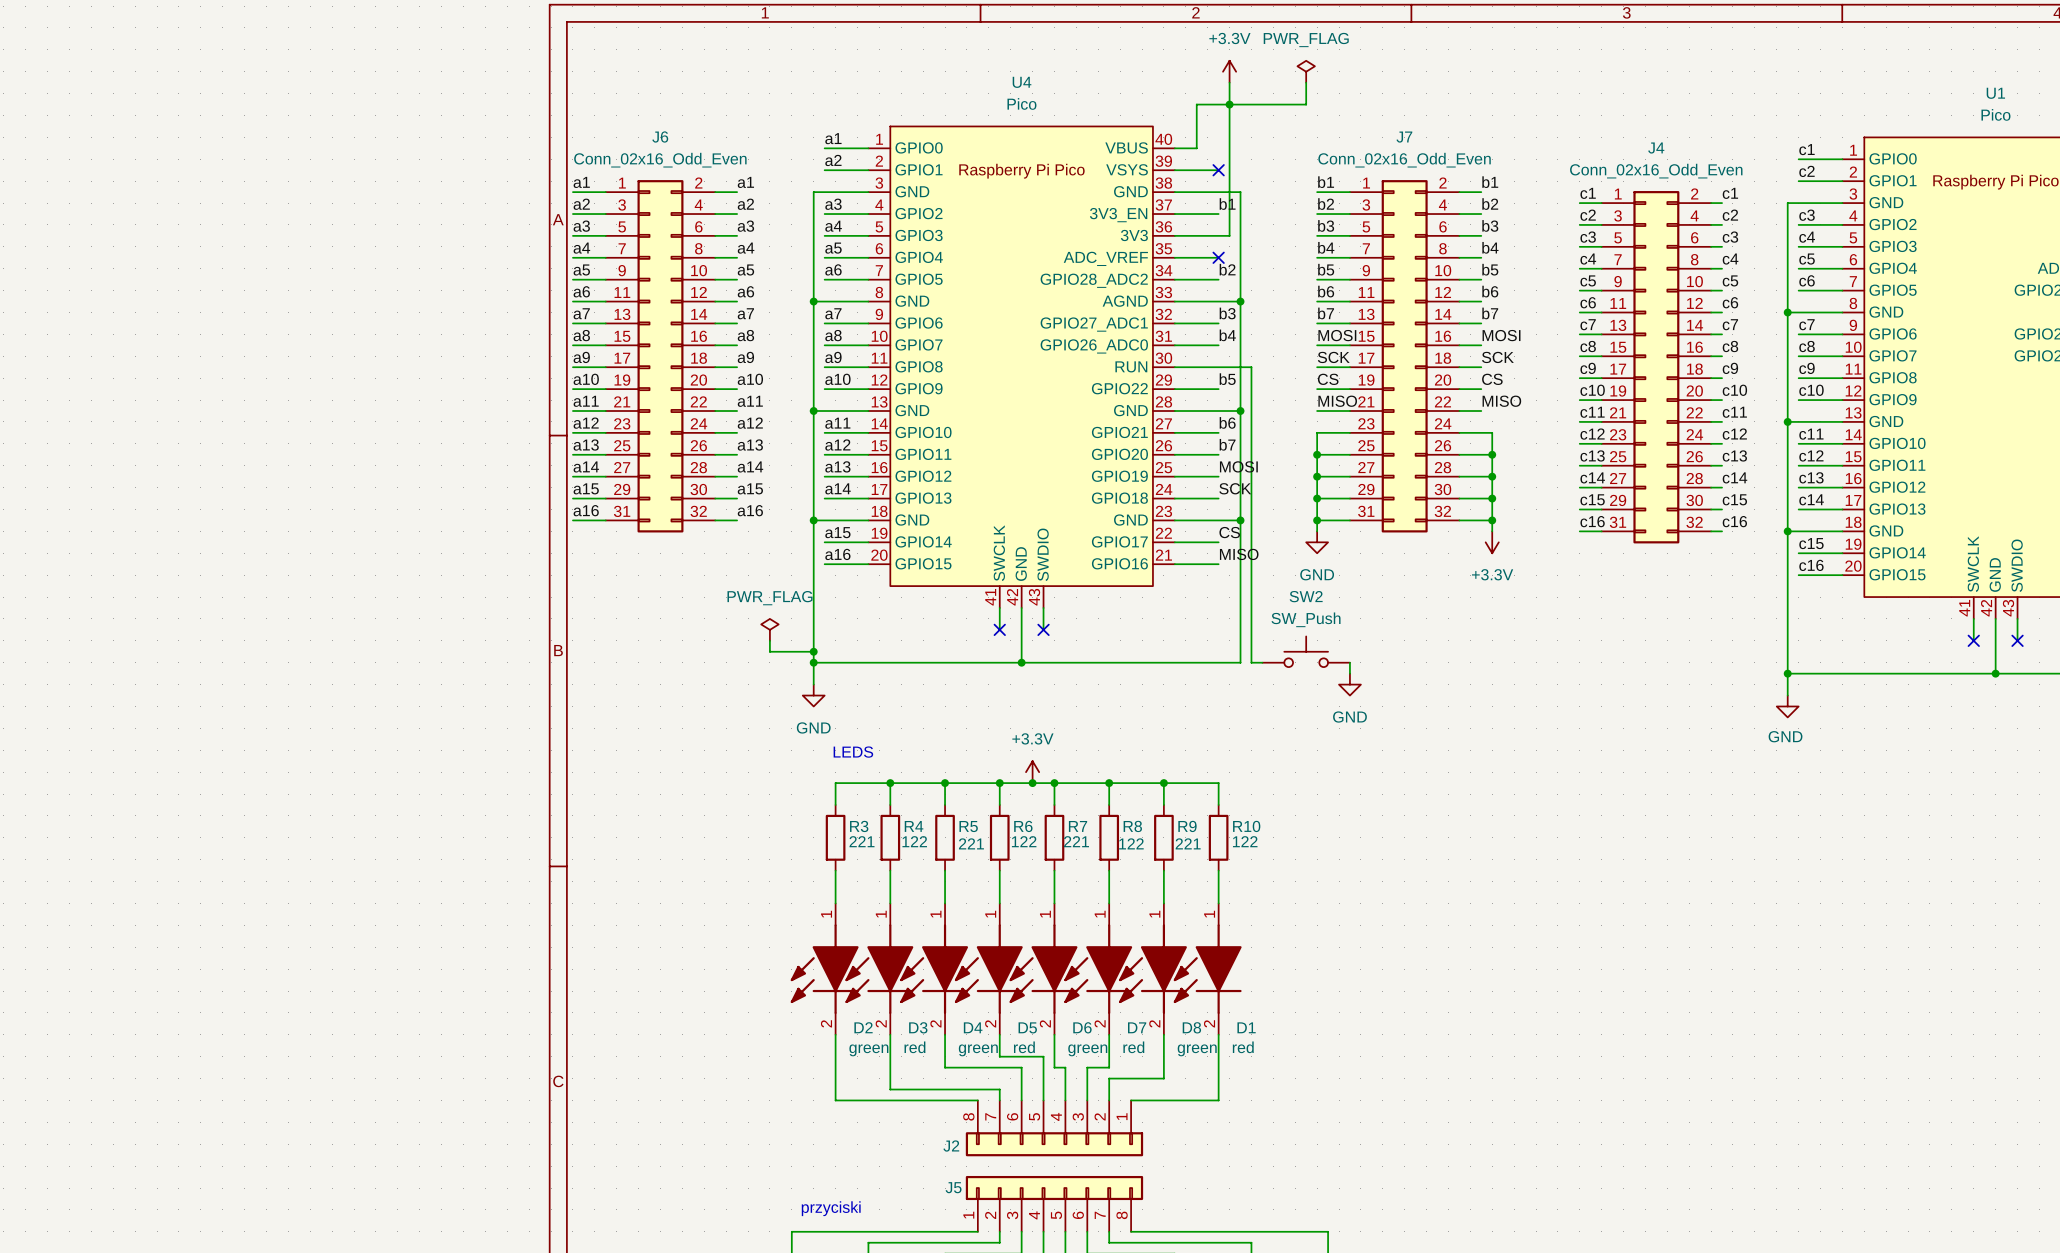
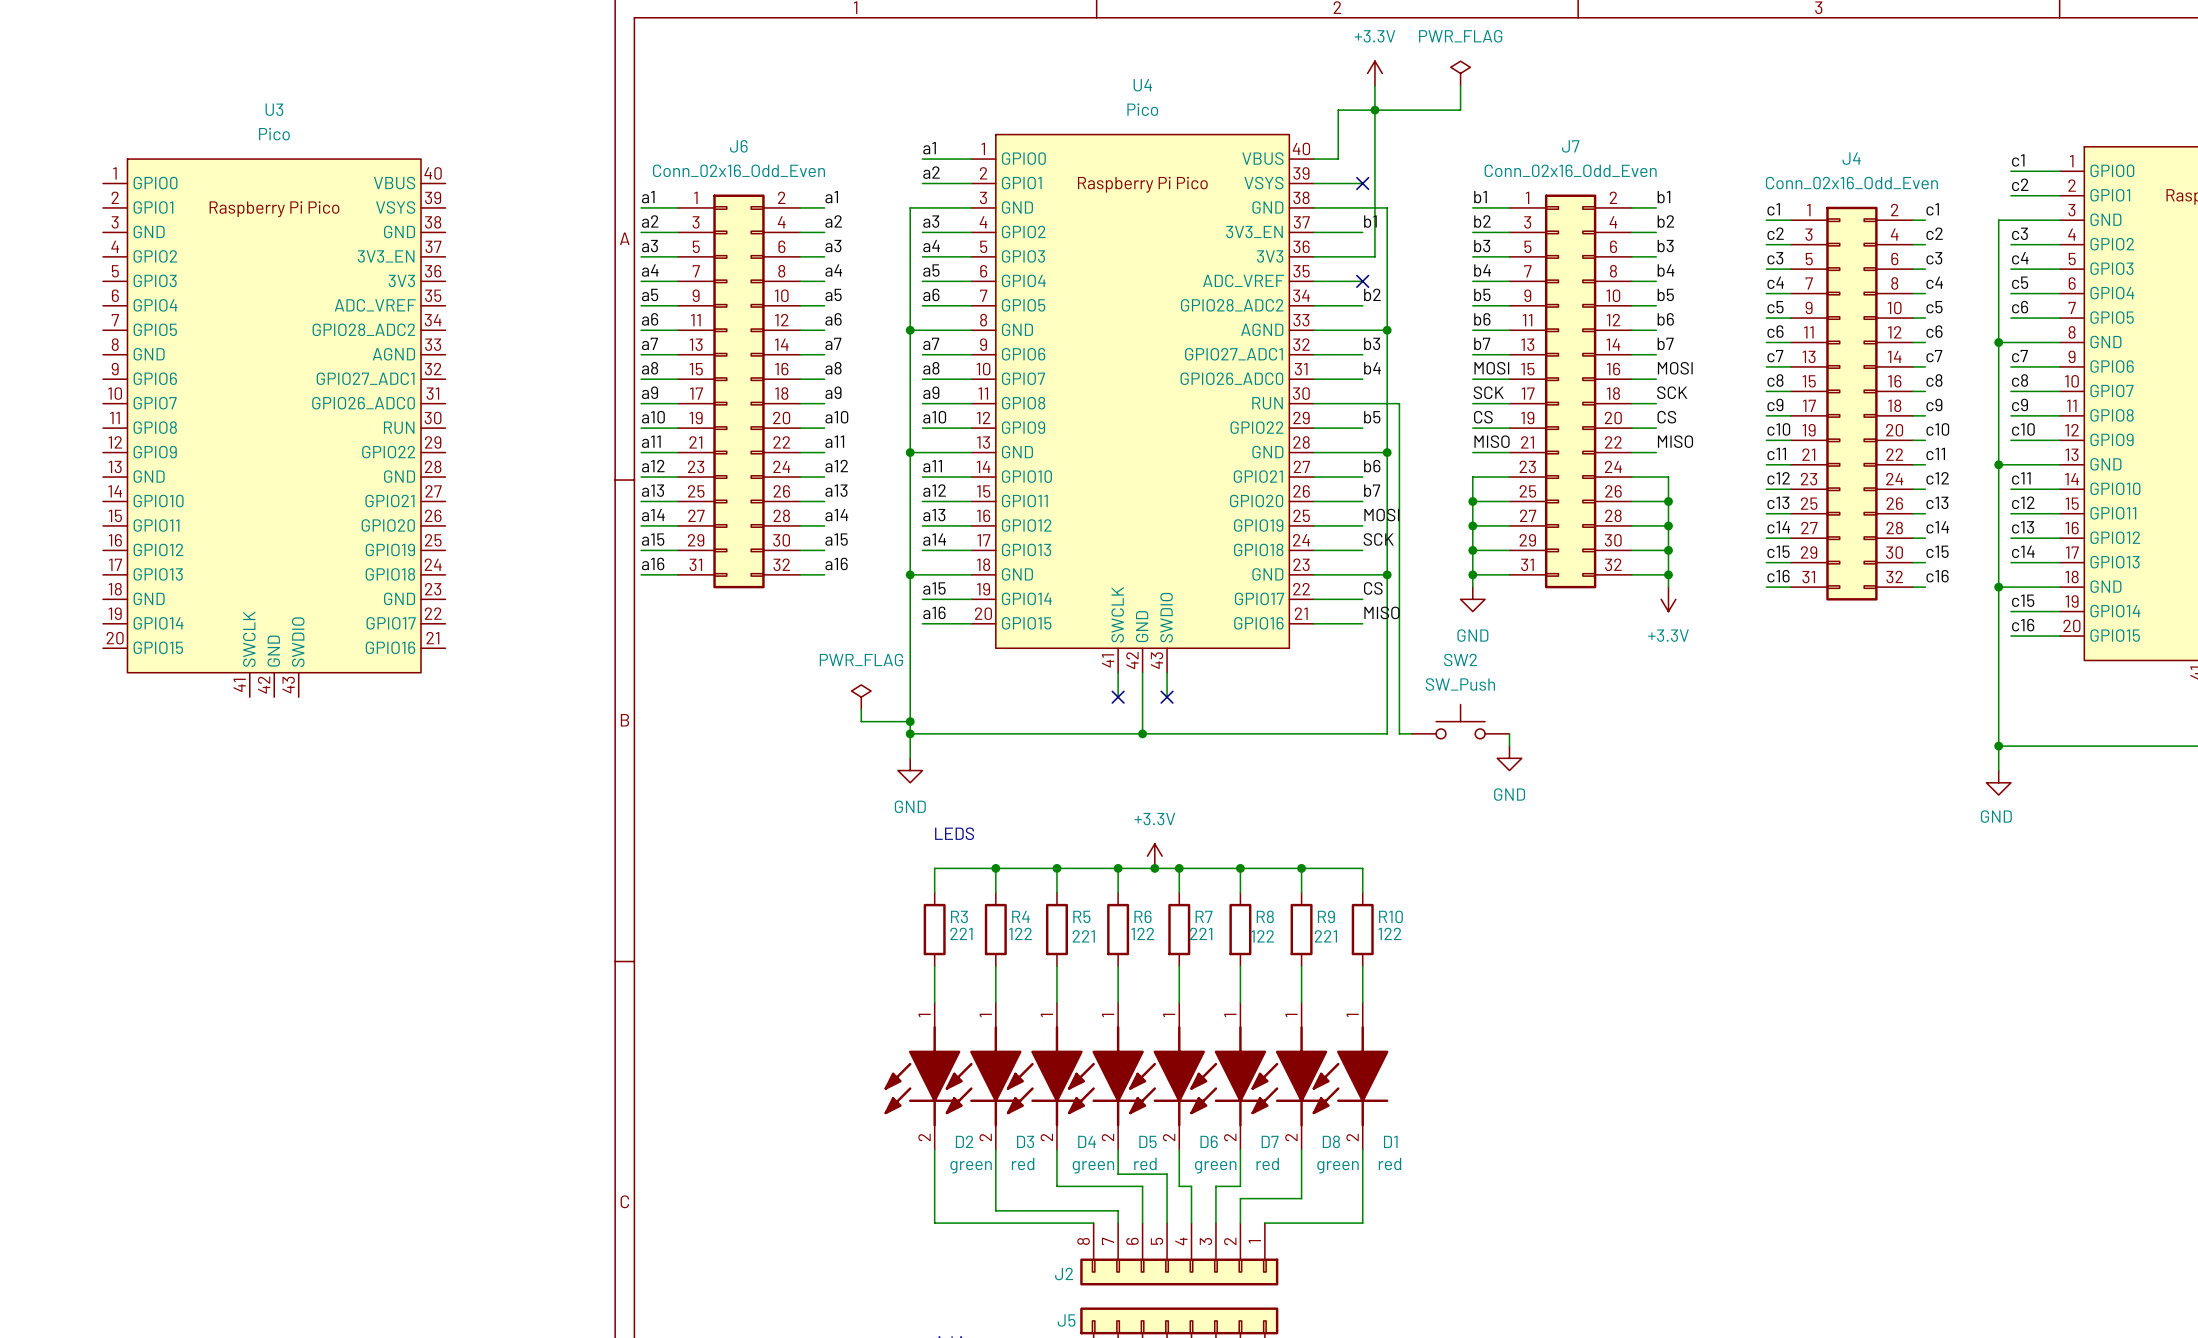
U3: none -> Pico (274, 428)

